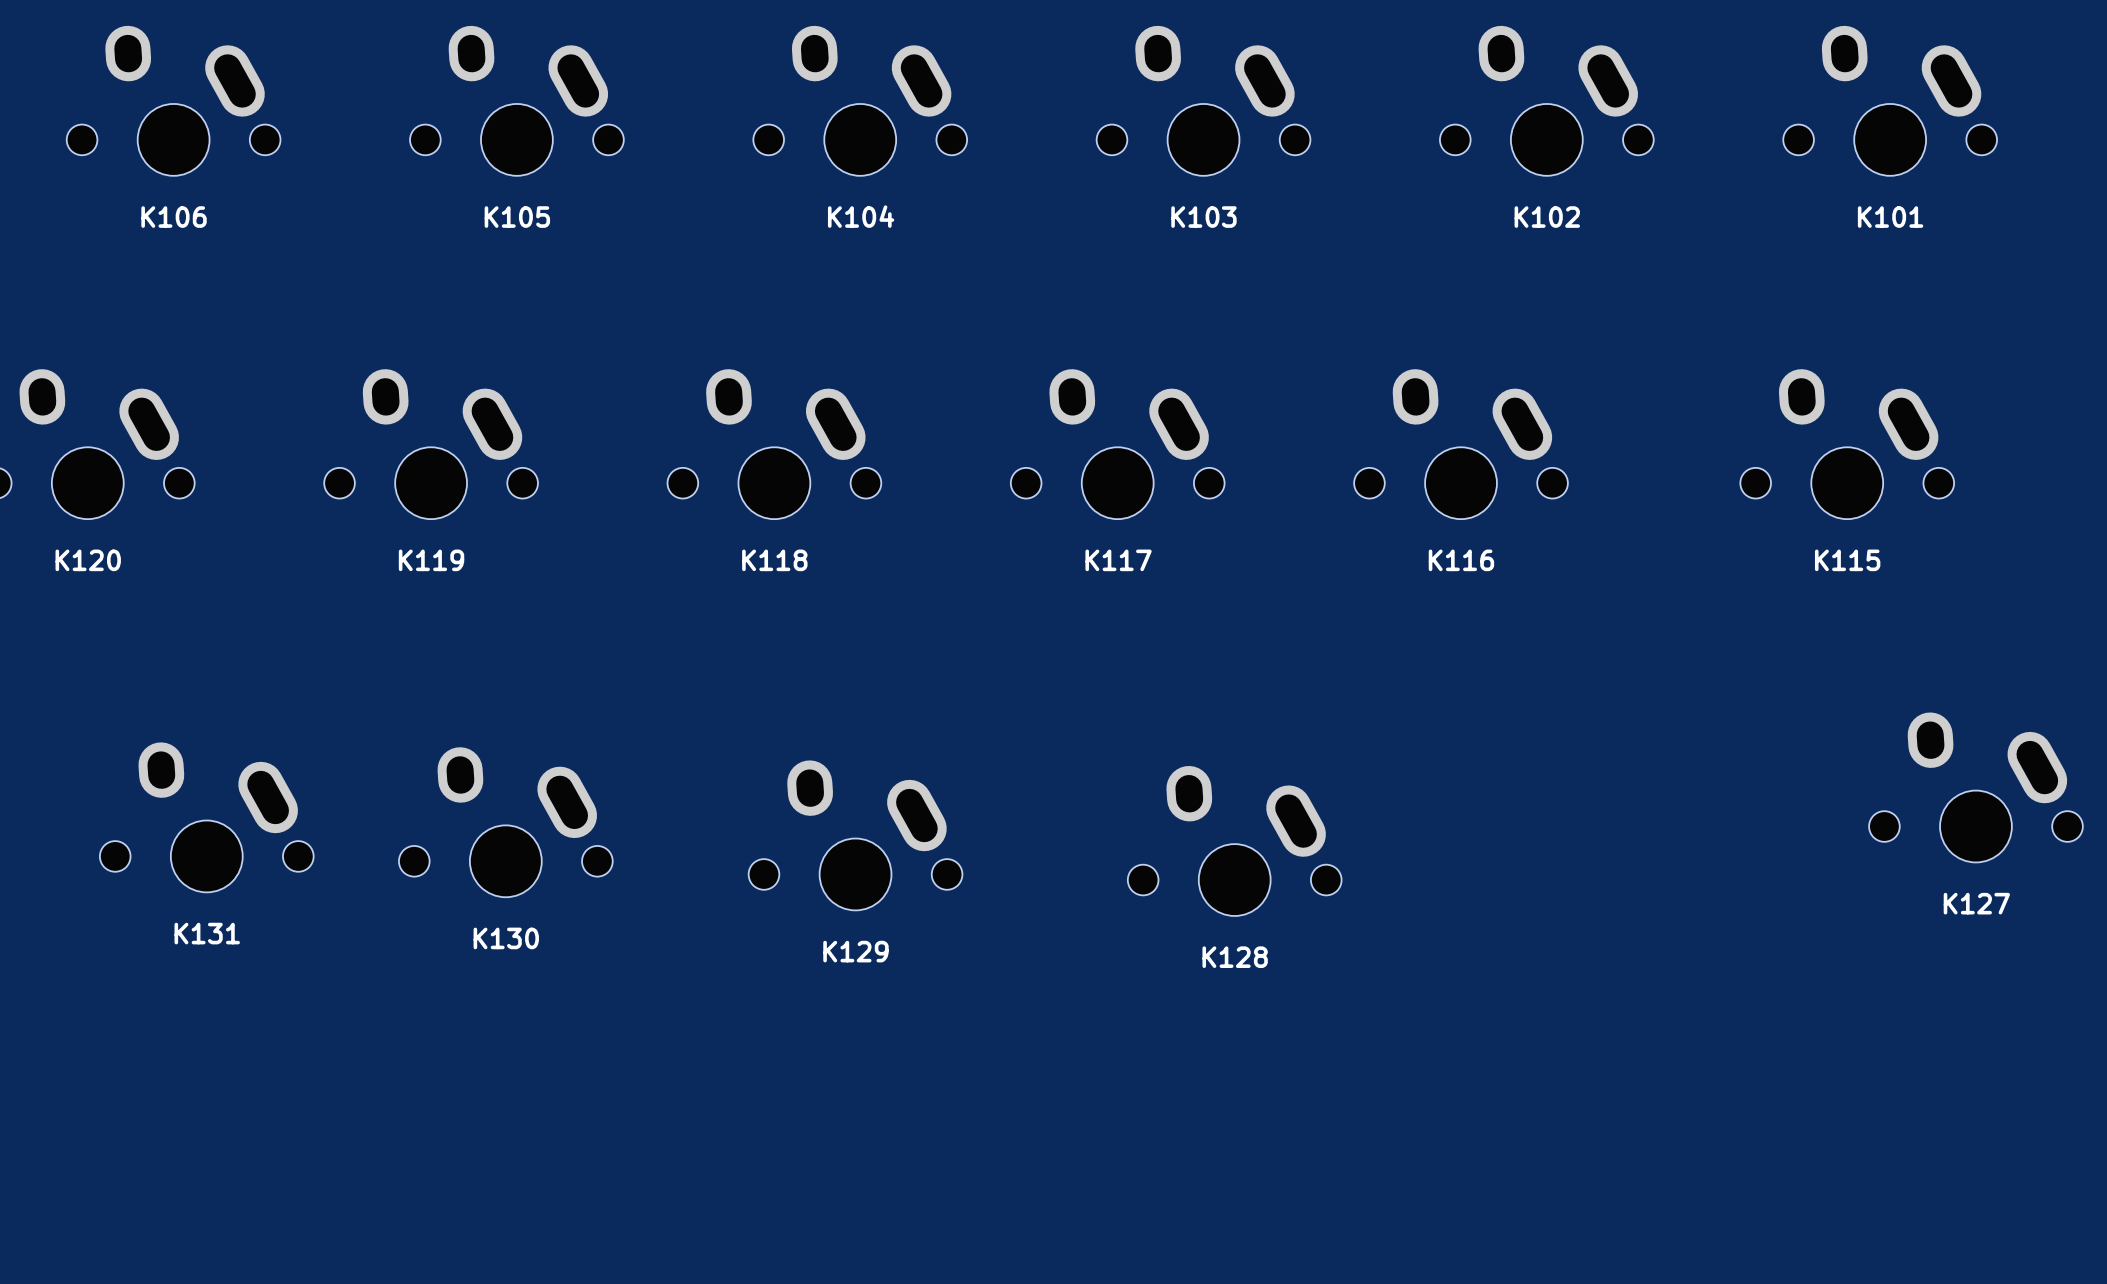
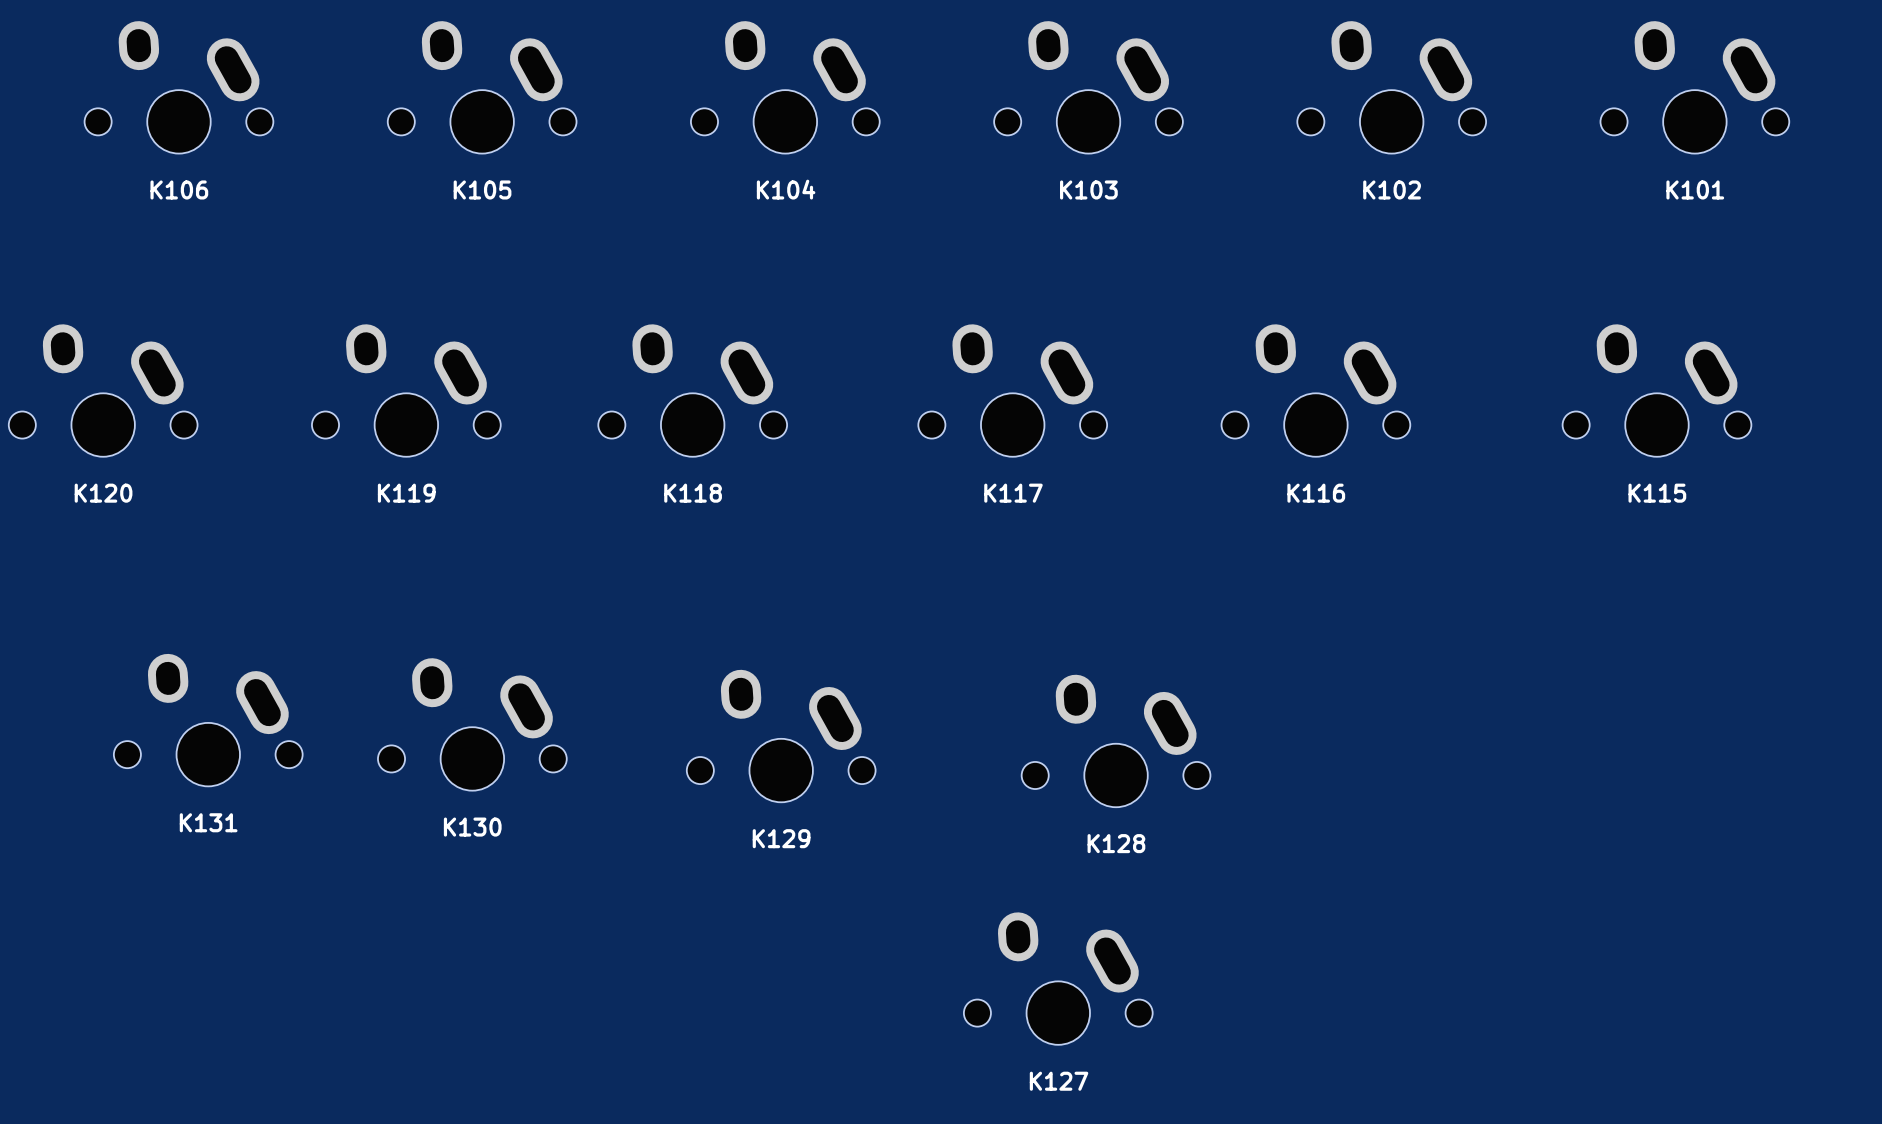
K118 position: (774, 444) -> (692, 390)
K127 position: (1975, 787) -> (1058, 978)

